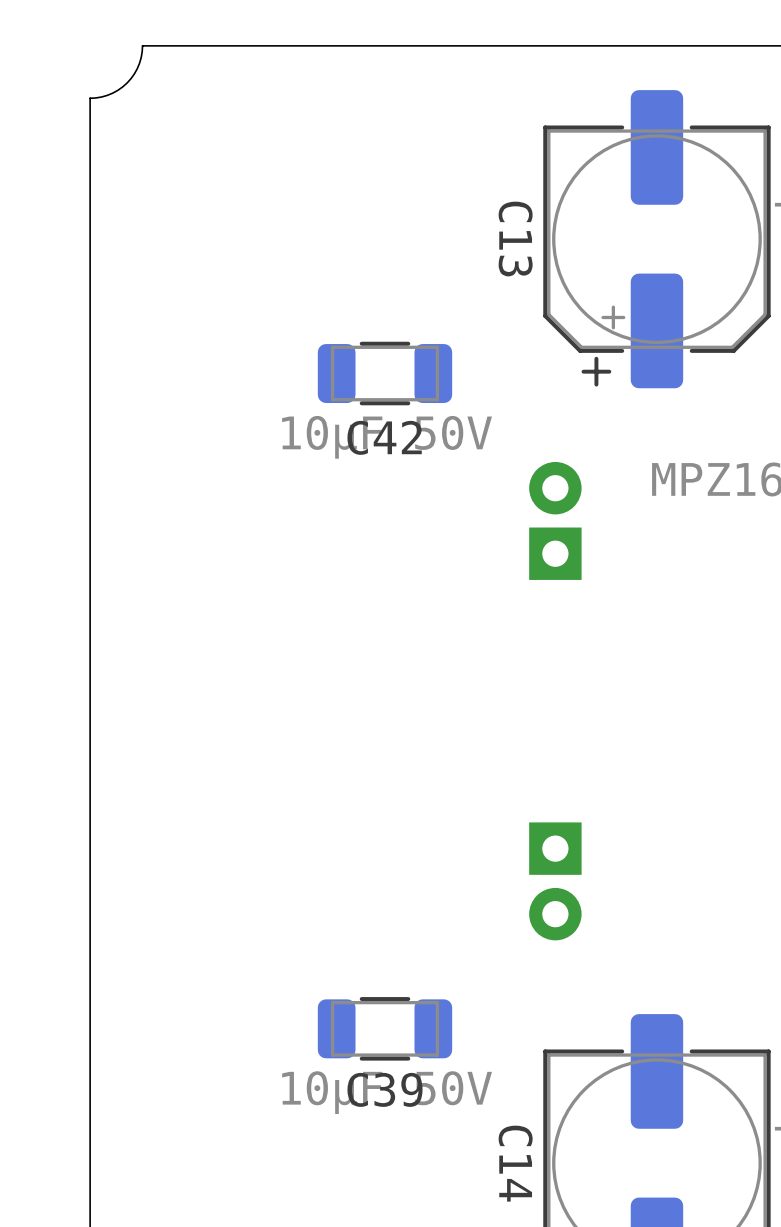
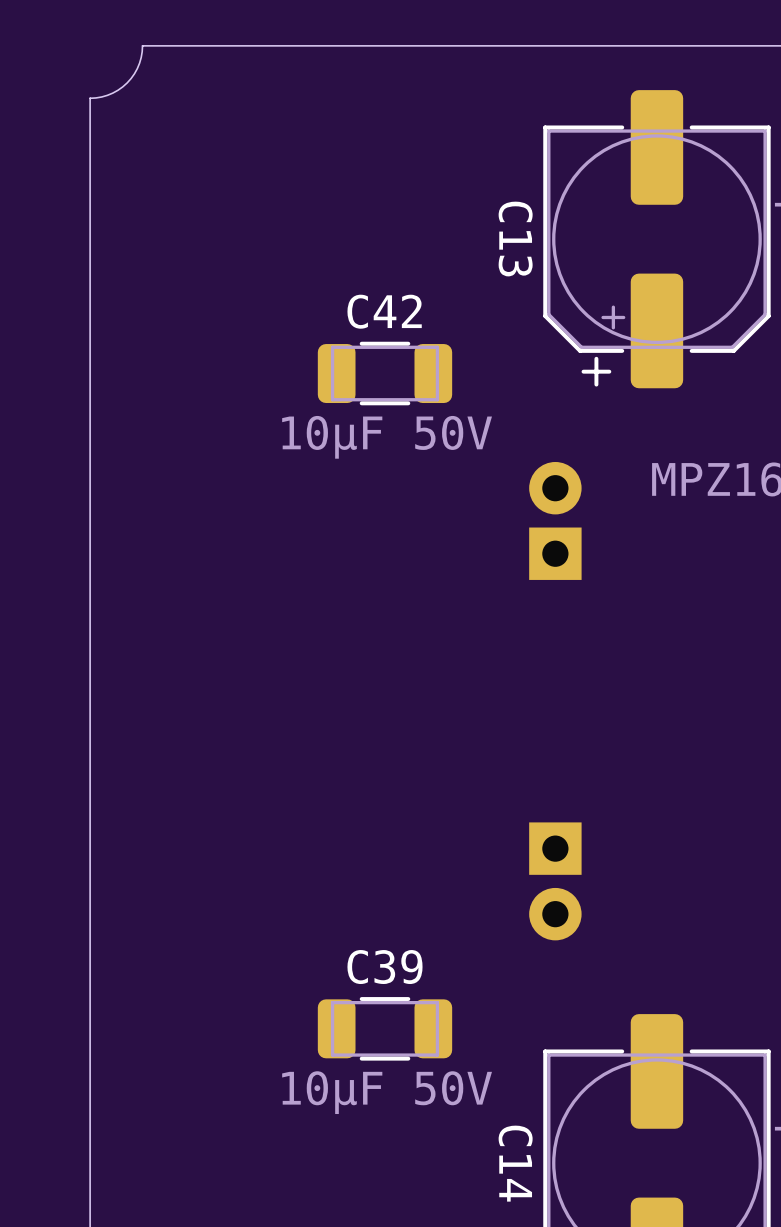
C42 name position: C42 (384, 437) -> C42 (384, 311)
C39 name position: C39 (384, 1089) -> C39 (384, 967)

